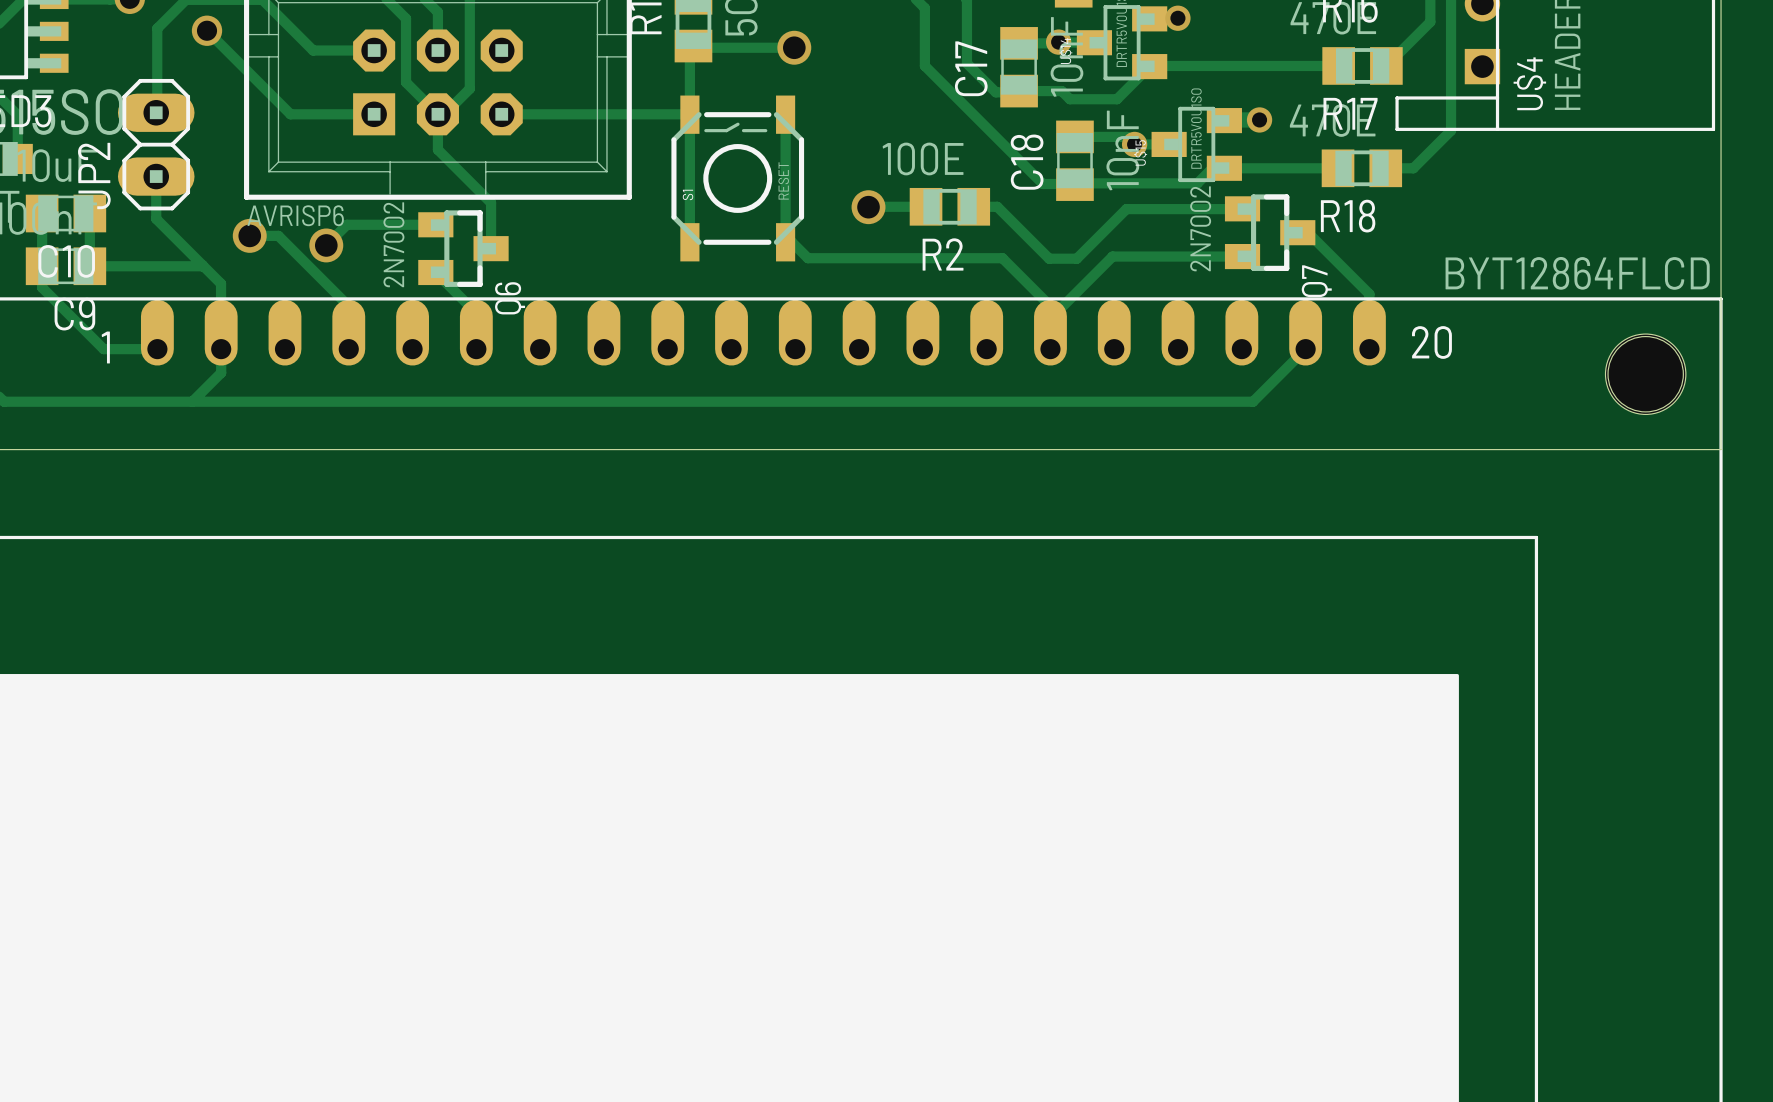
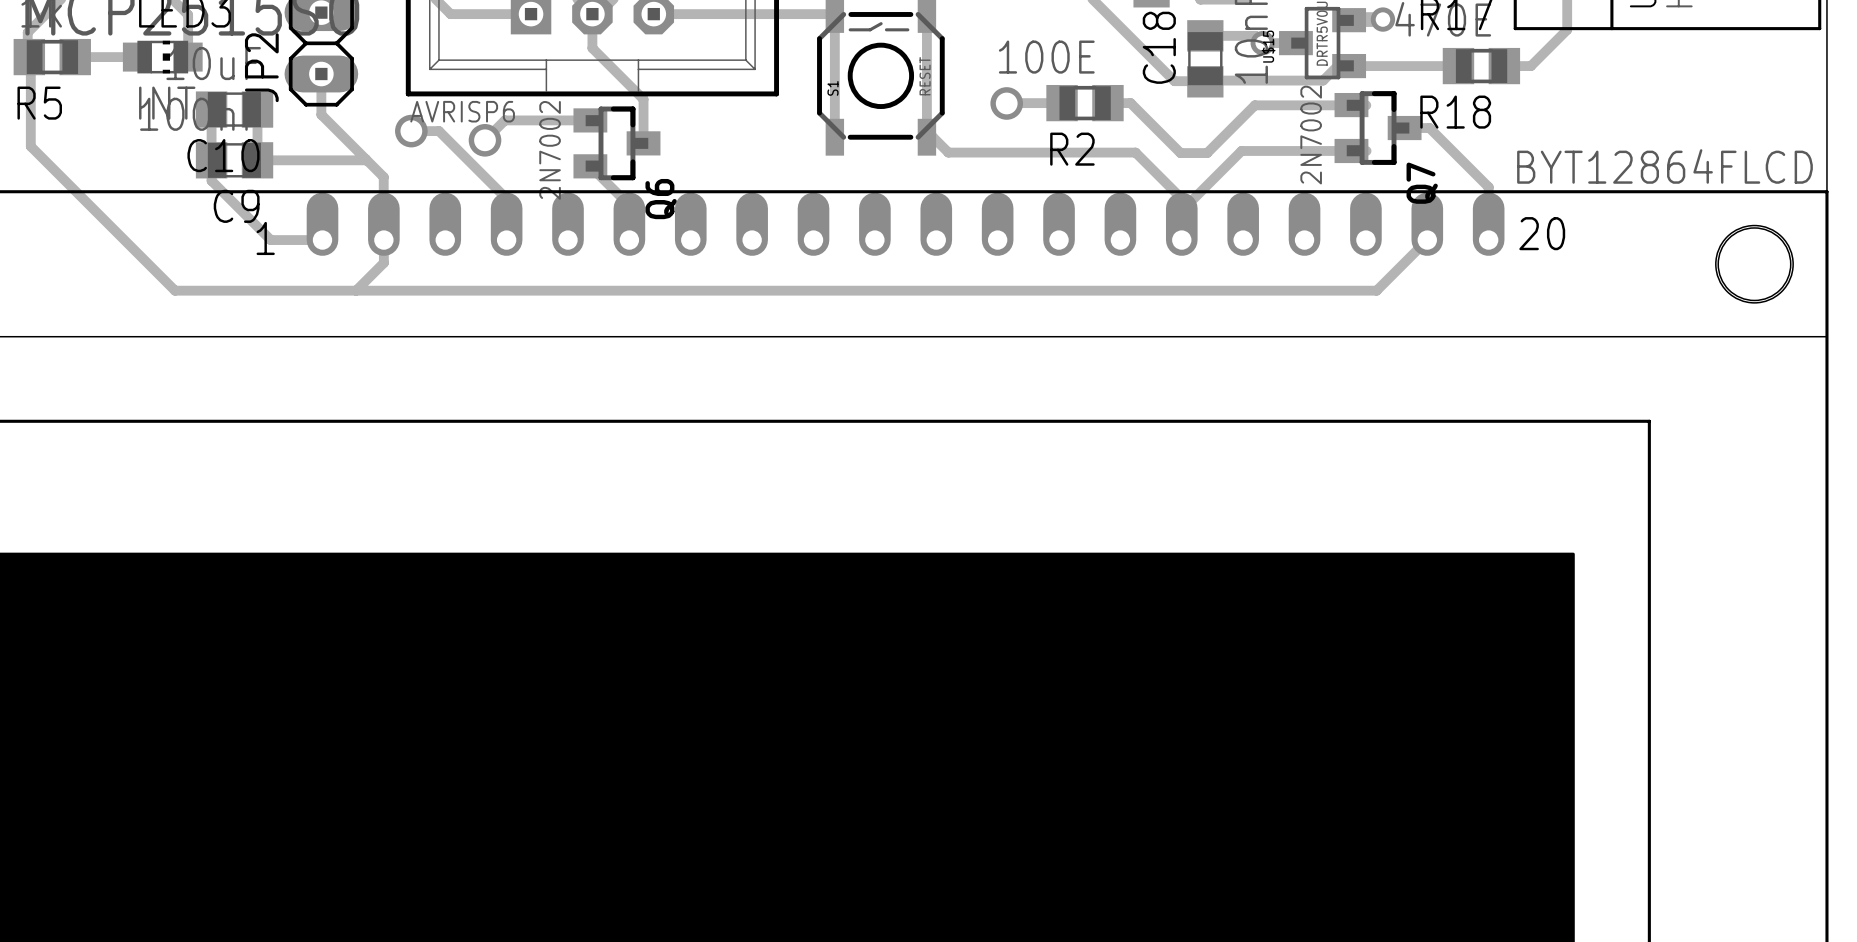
Q7 position: (1270, 232) -> (1378, 128)

